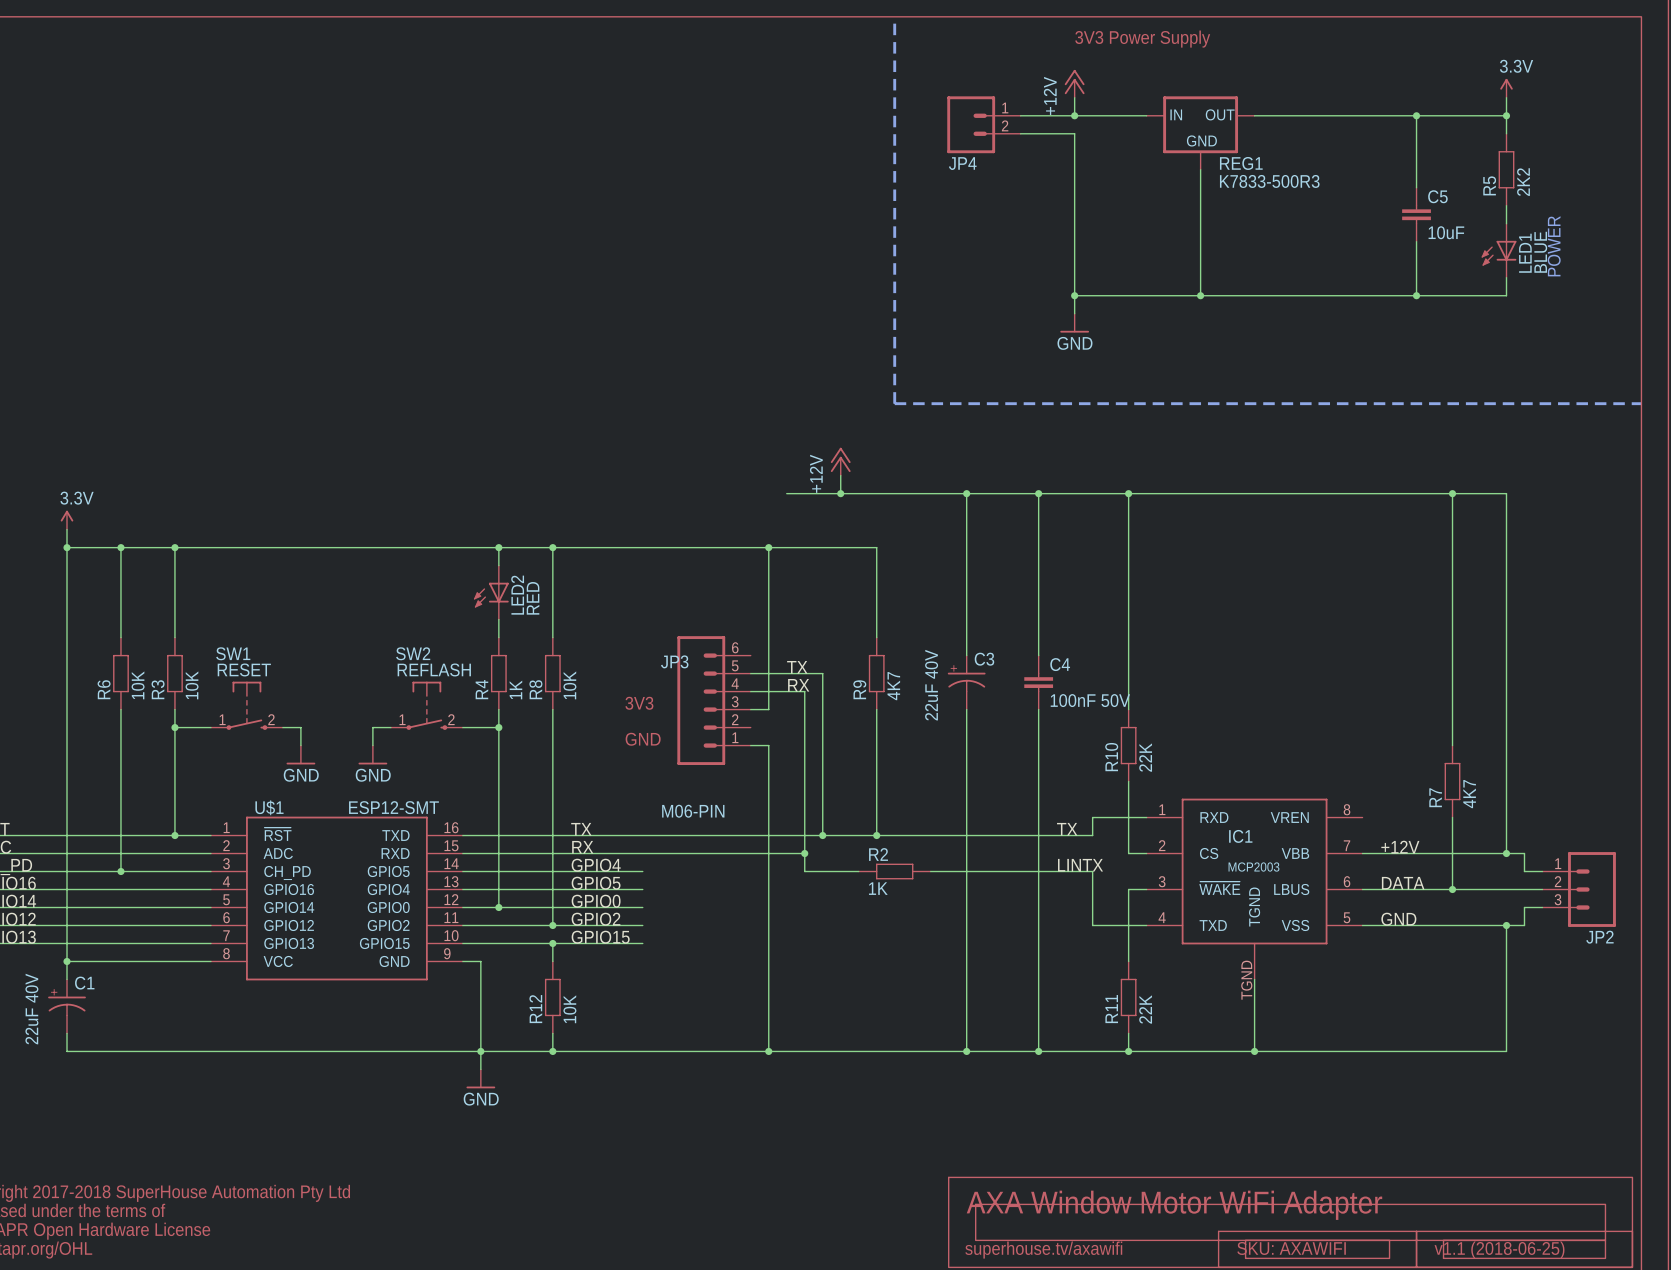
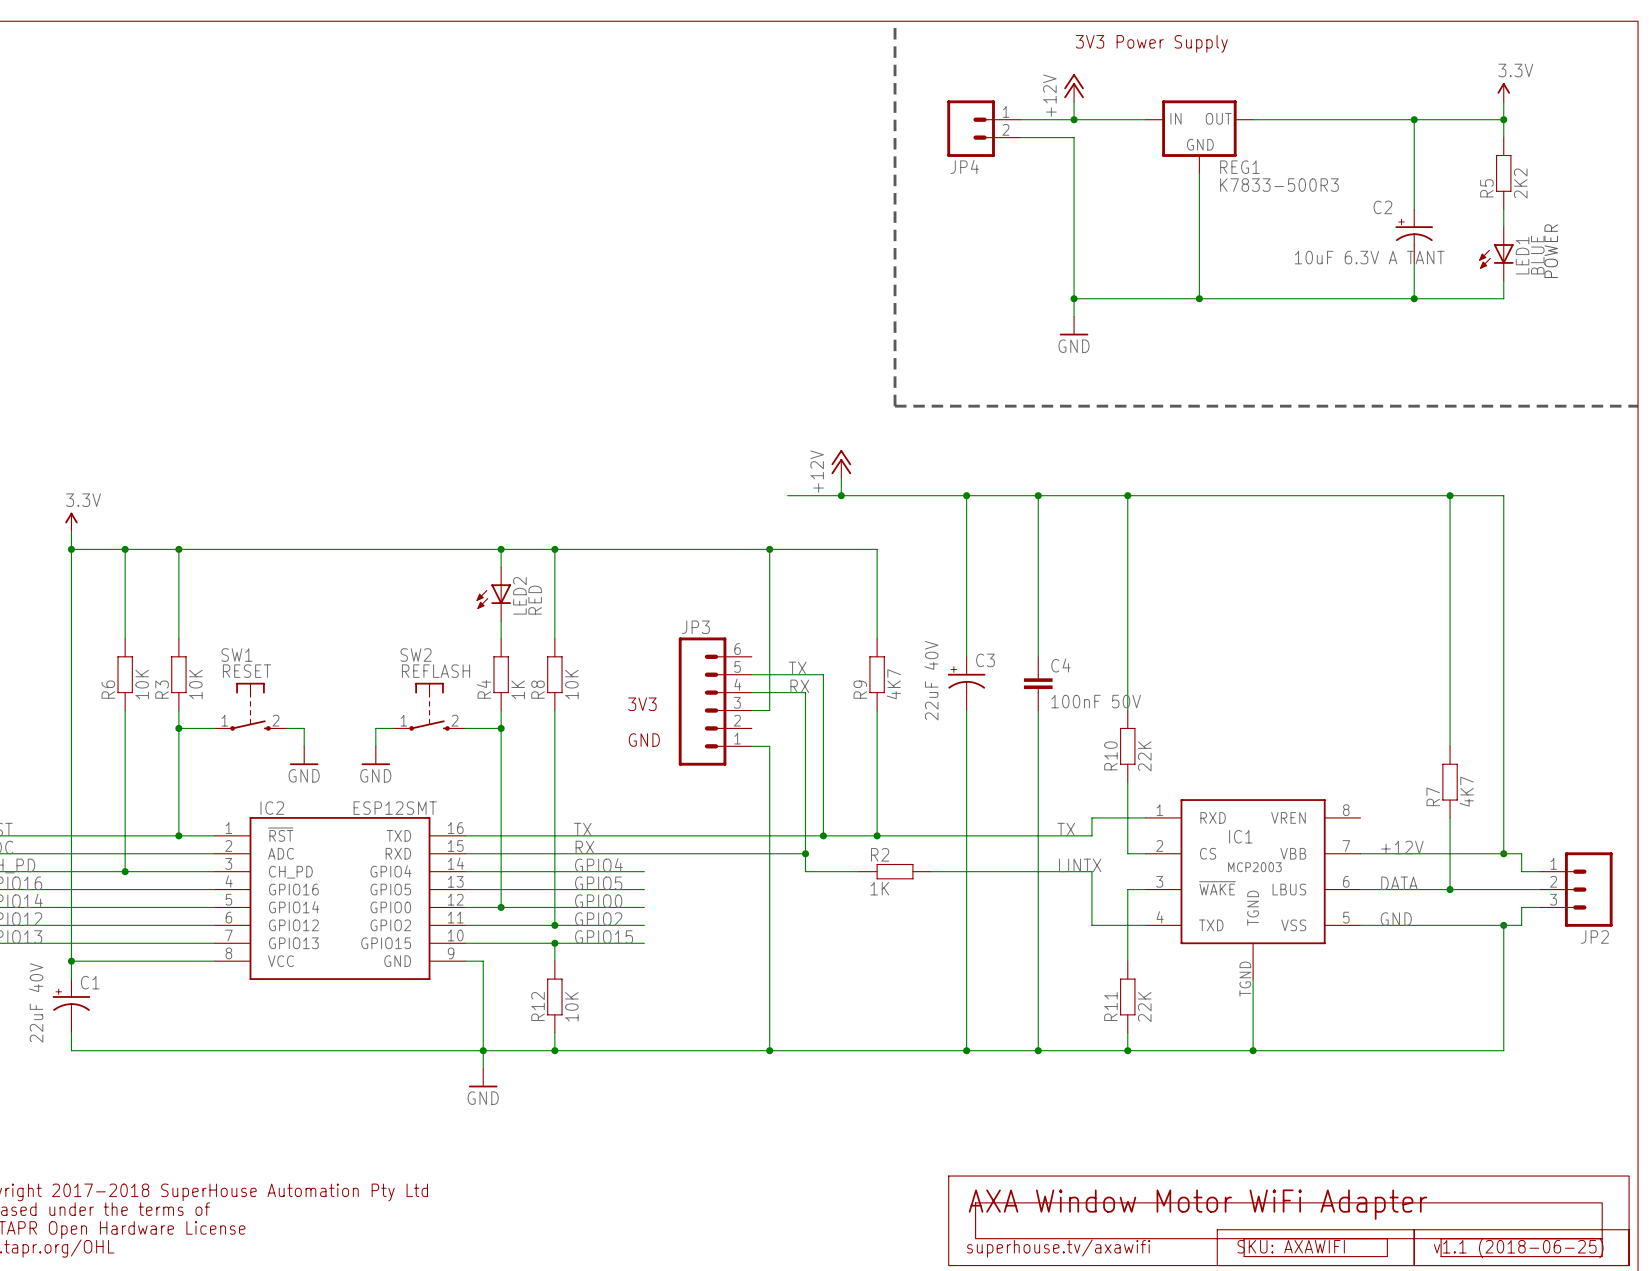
C5: 10uF (1416, 214) -> none
C2: none -> 10uF 6.3V A TANT (1414, 236)
JP3 name position: JP3 (674, 661) -> JP3 (695, 627)
U$1 name: U$1 (269, 807) -> IC2 (272, 808)
U$1 value: ESP12-SMT (393, 807) -> ESP12SMT (395, 808)
JP3 value: M06-PIN (693, 811) -> none
U$1 pin name: GPIO5 (388, 871) -> GPIO4 (390, 871)
U$1 pin name: GPIO4 (388, 889) -> GPIO5 (390, 889)

